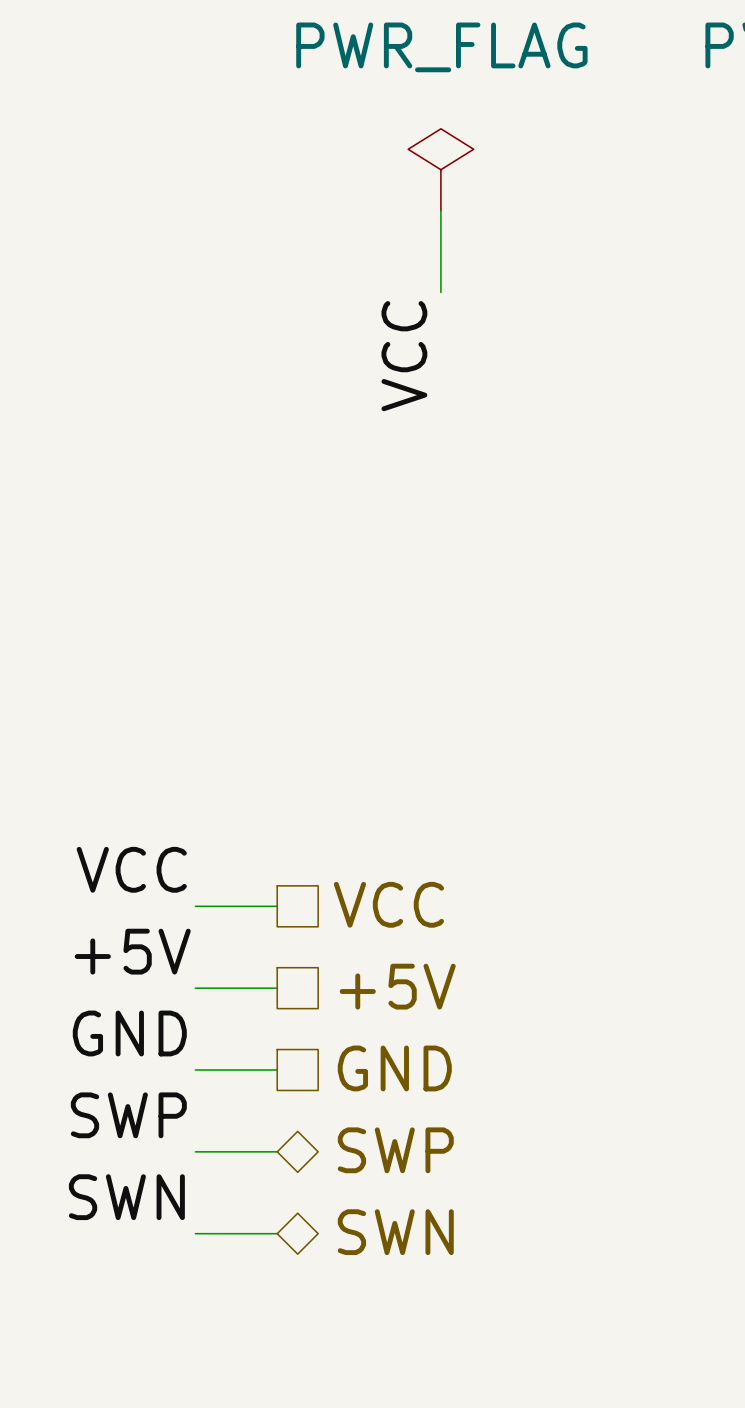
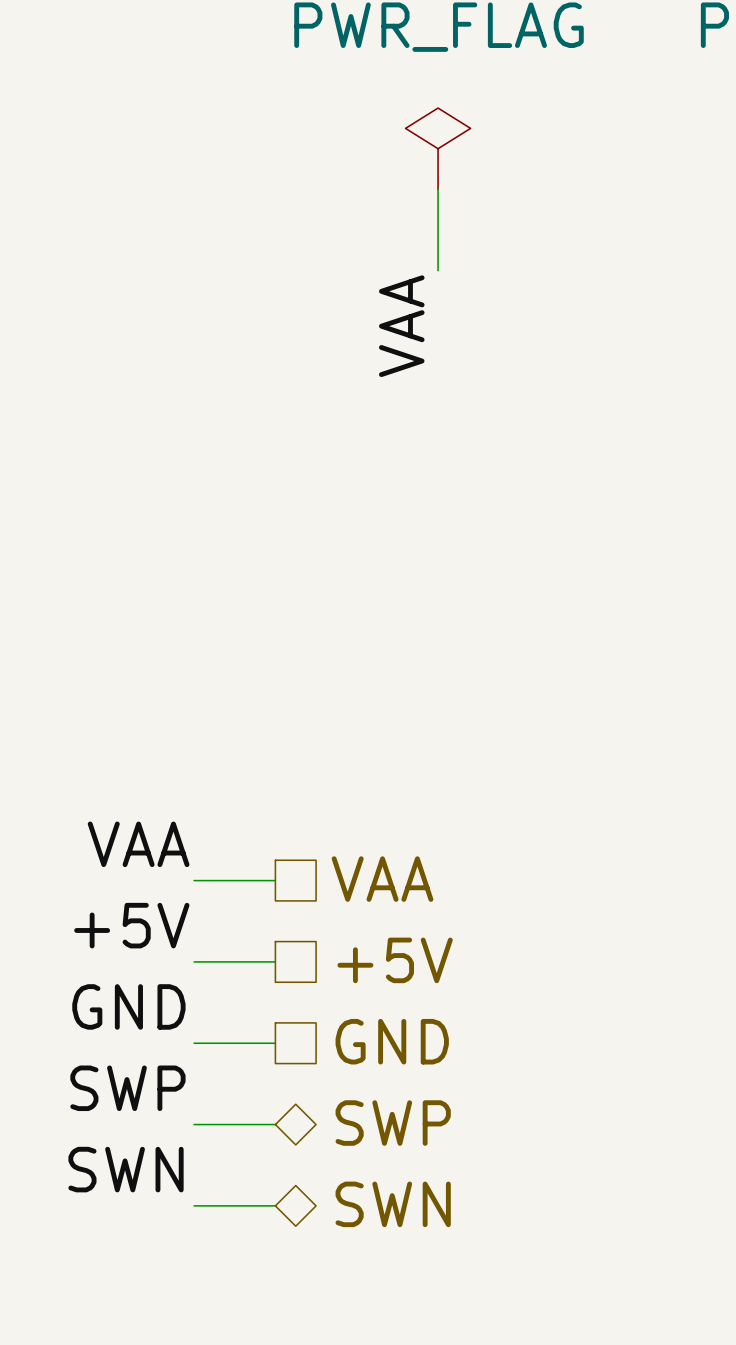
label: VCC (404, 356) -> VAA (401, 326)
label: VCC (131, 869) -> VAA (138, 844)
hierarchical label: VCC (388, 904) -> VAA (382, 879)

